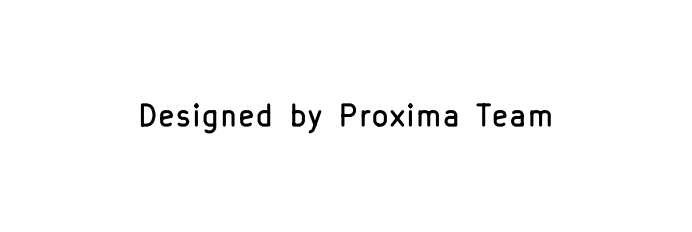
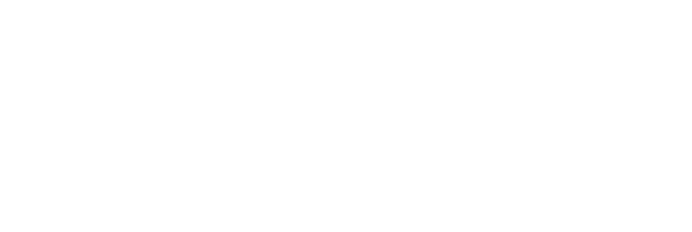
text: Designed by Proxima Team (345, 118) -> none

